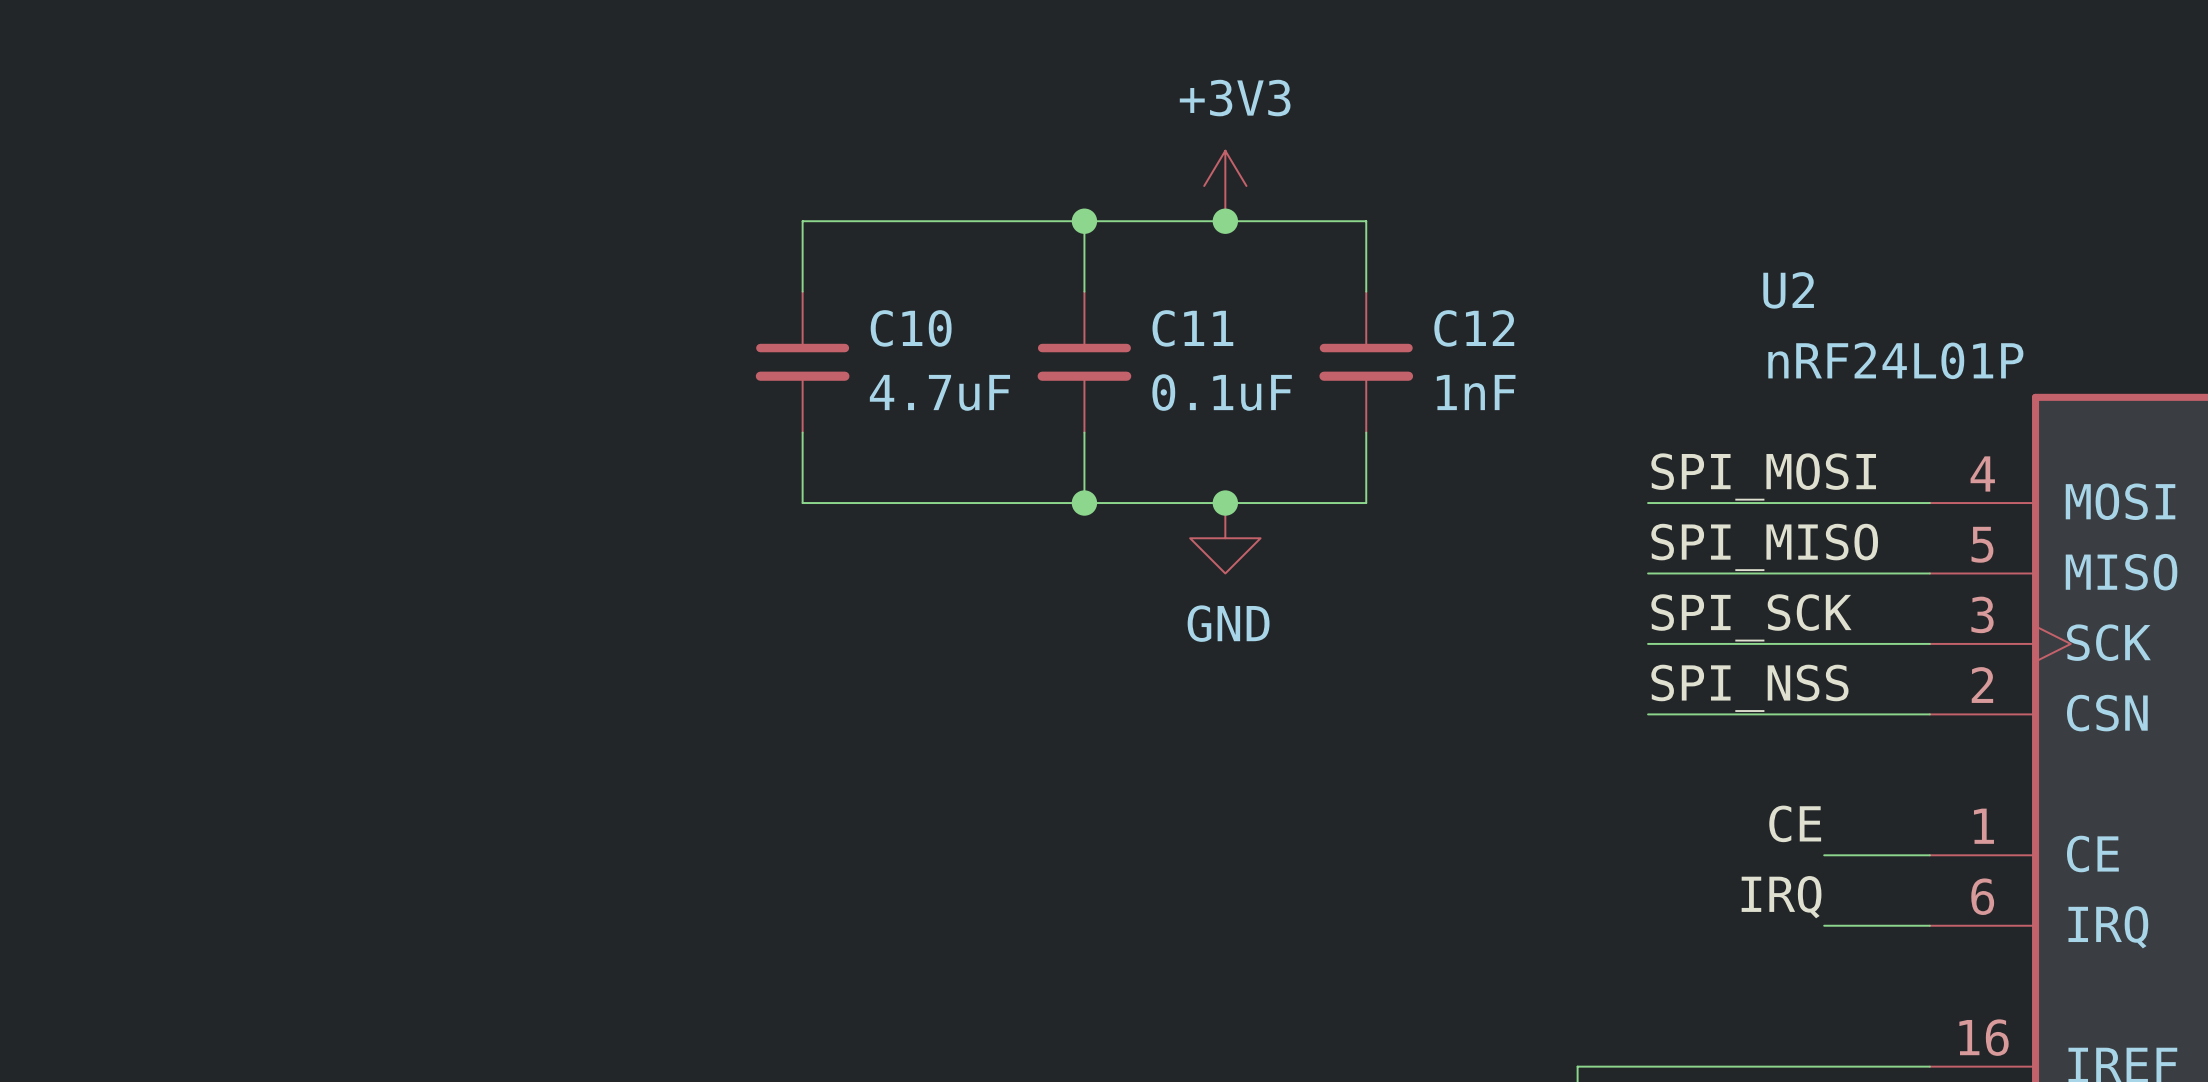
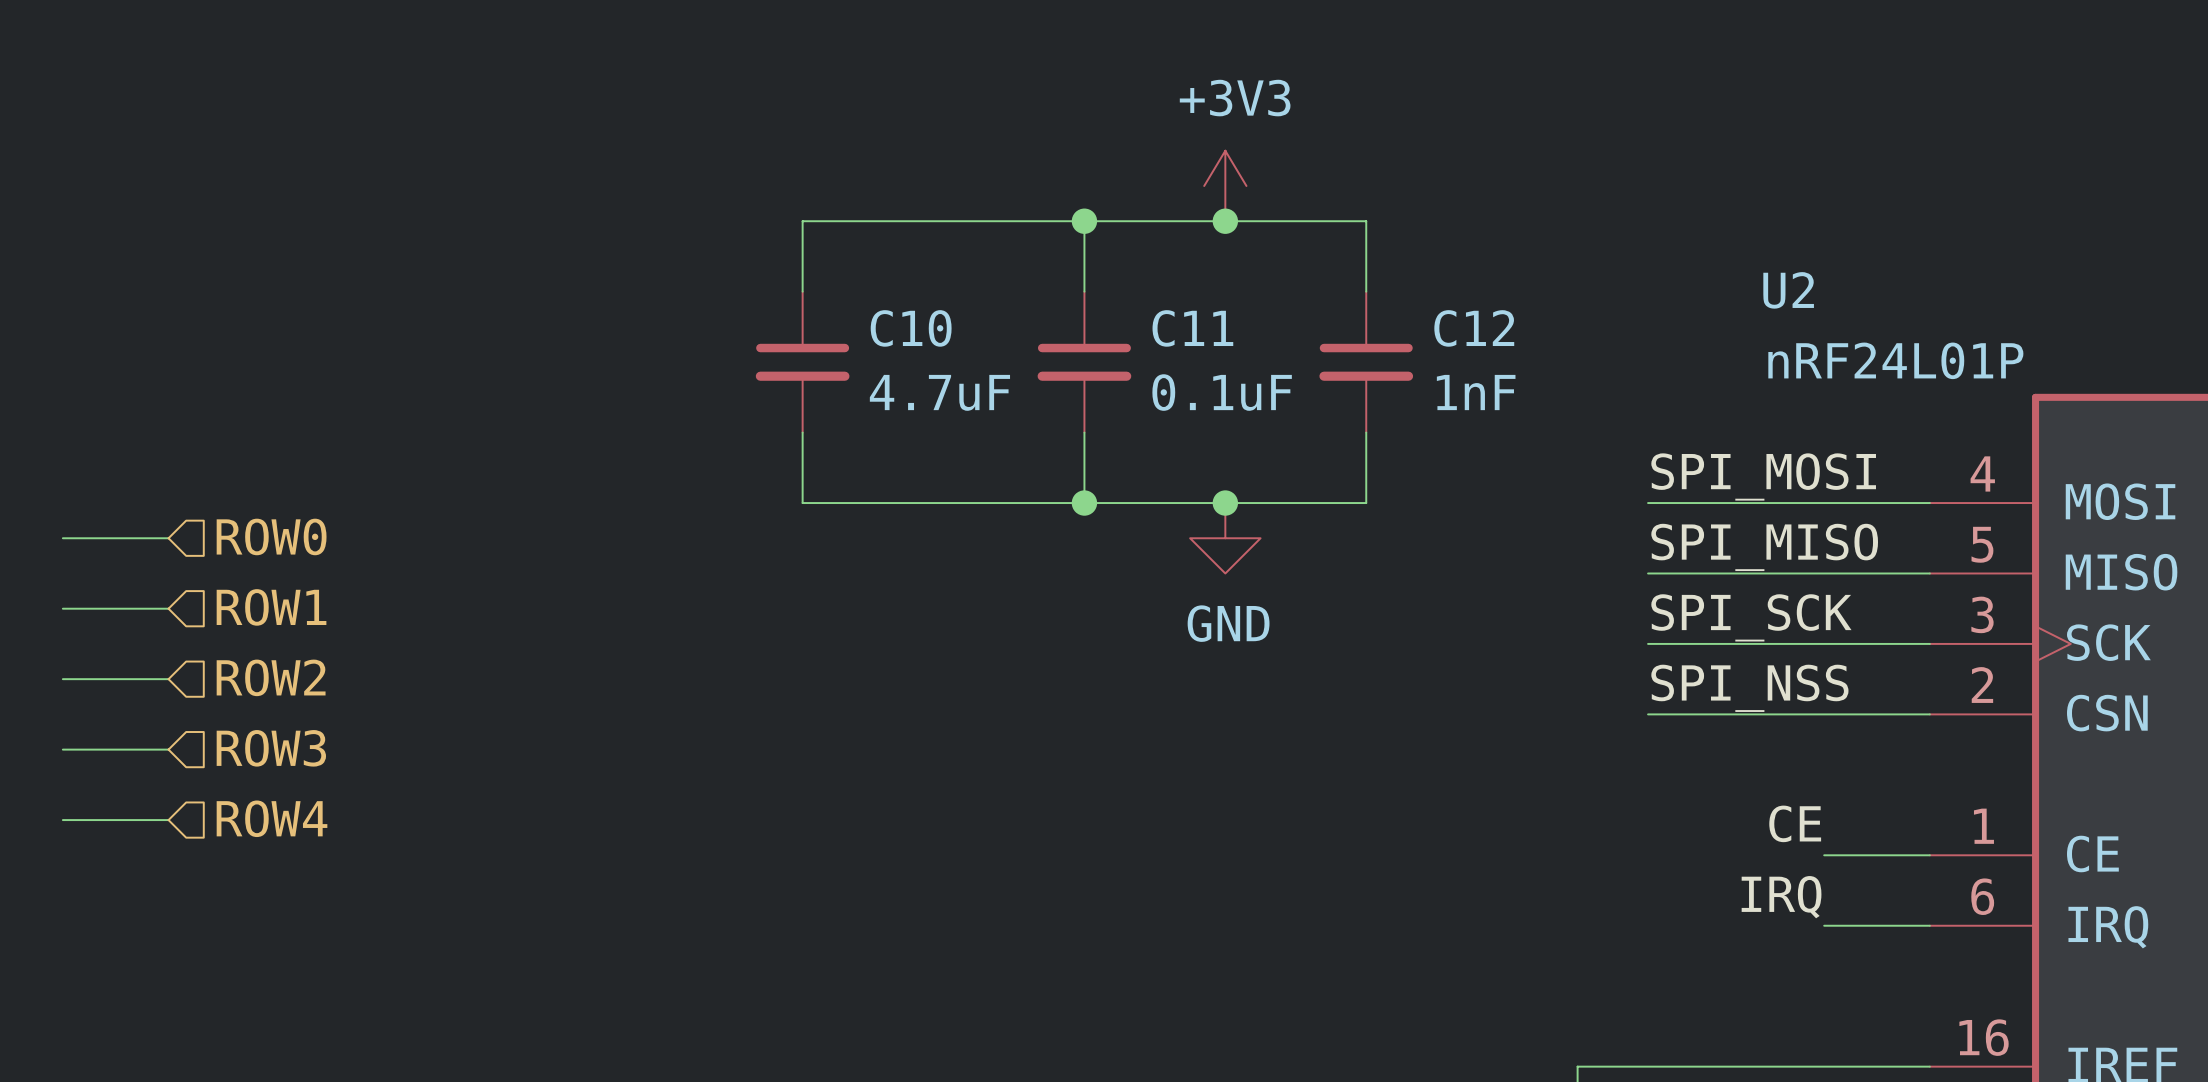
hierarchical label: none -> ROW0 (271, 536)
wire: none -> (62, 538) (168, 538)
hierarchical label: none -> ROW1 (271, 607)
wire: none -> (62, 608) (168, 608)
hierarchical label: none -> ROW2 (271, 677)
wire: none -> (62, 679) (168, 679)
hierarchical label: none -> ROW3 (271, 748)
wire: none -> (62, 749) (168, 749)
hierarchical label: none -> ROW4 (272, 818)
wire: none -> (62, 820) (168, 820)

